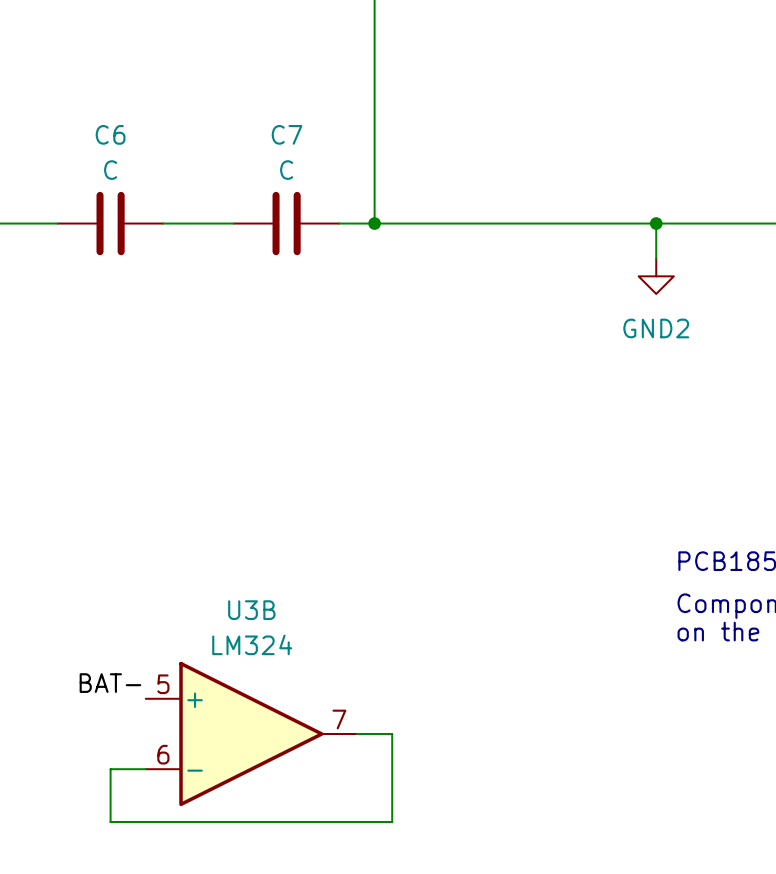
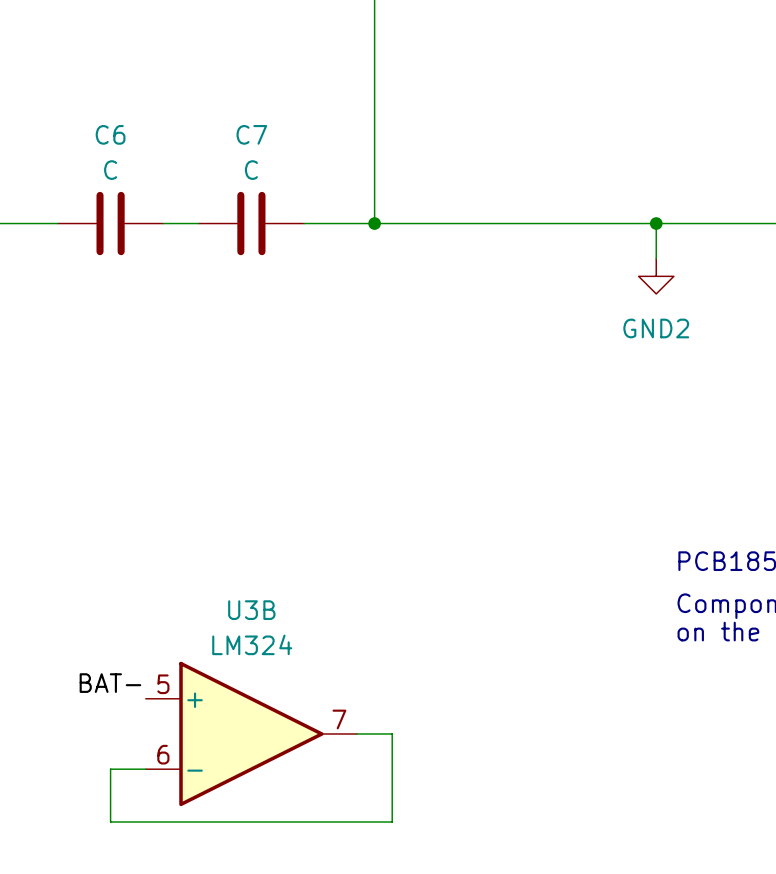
C7 position: (286, 223) -> (251, 223)

